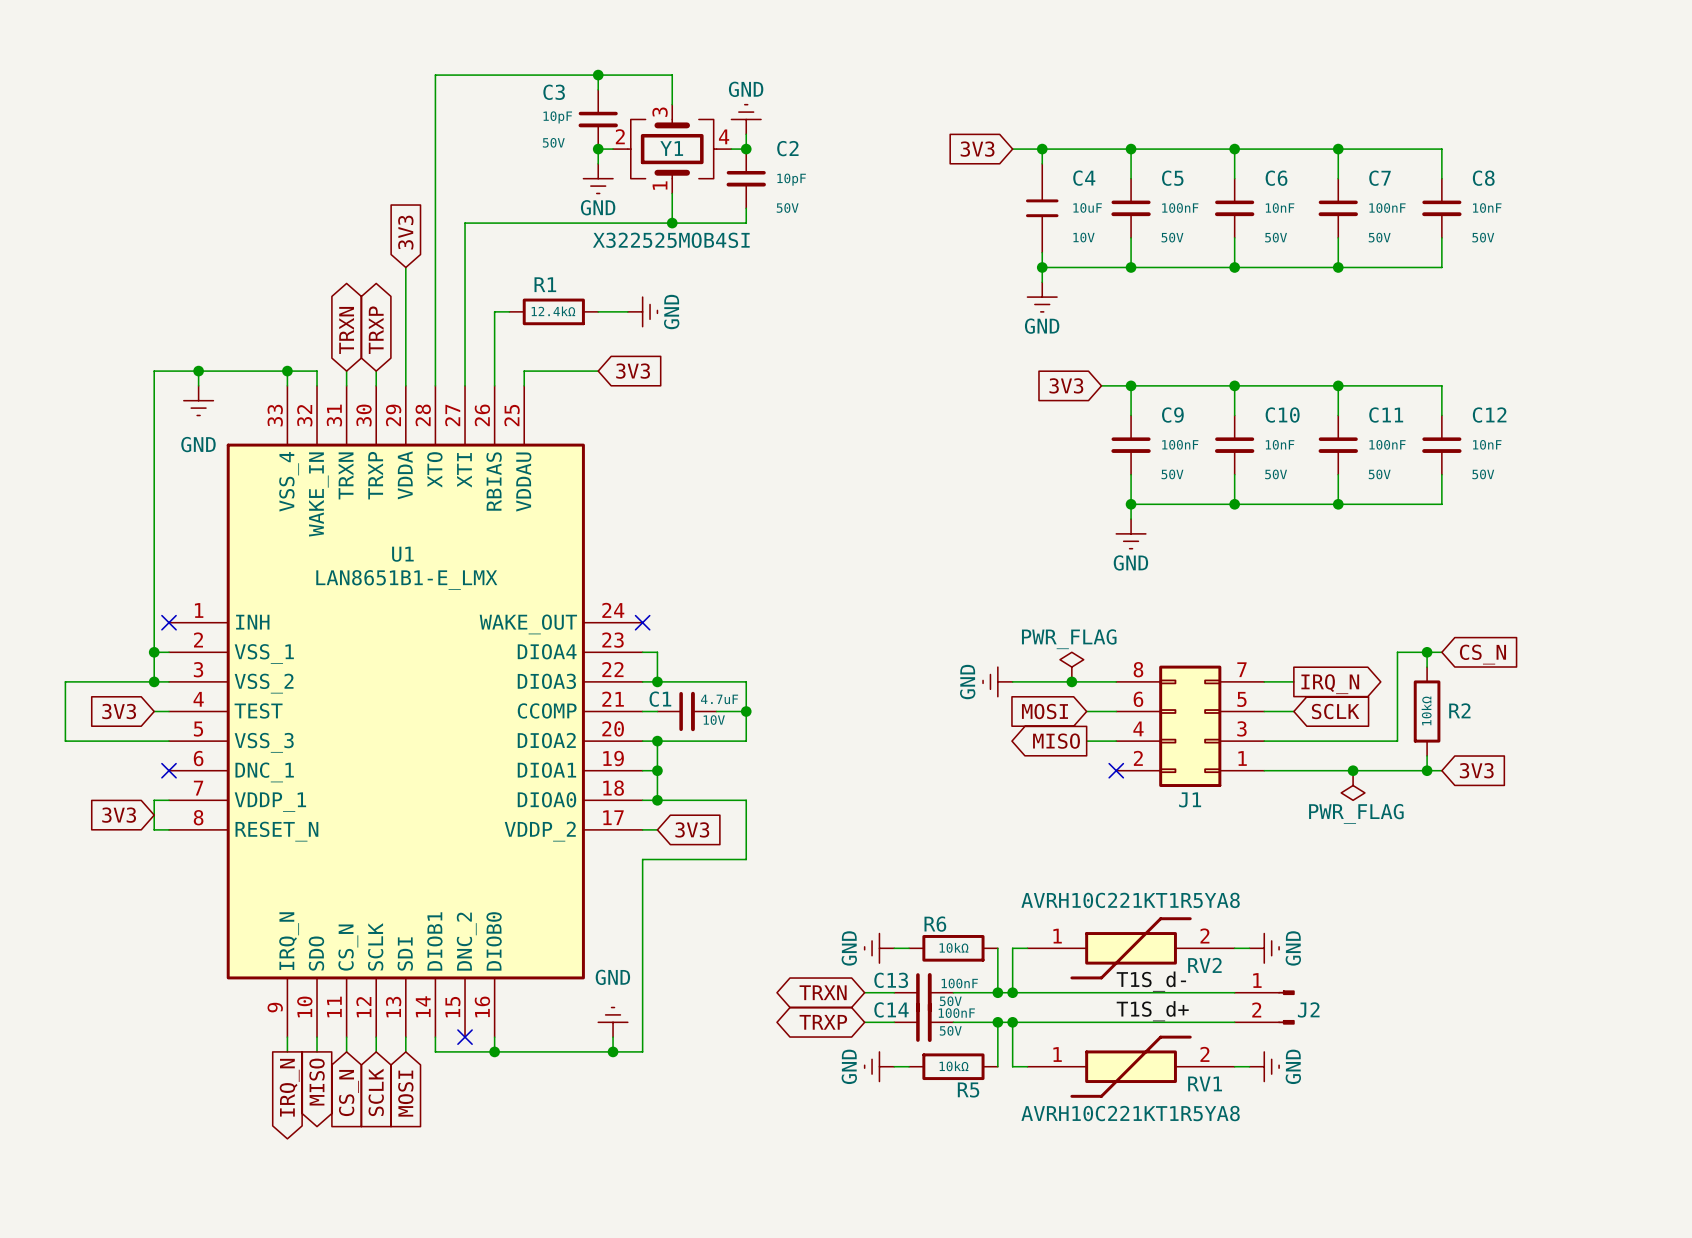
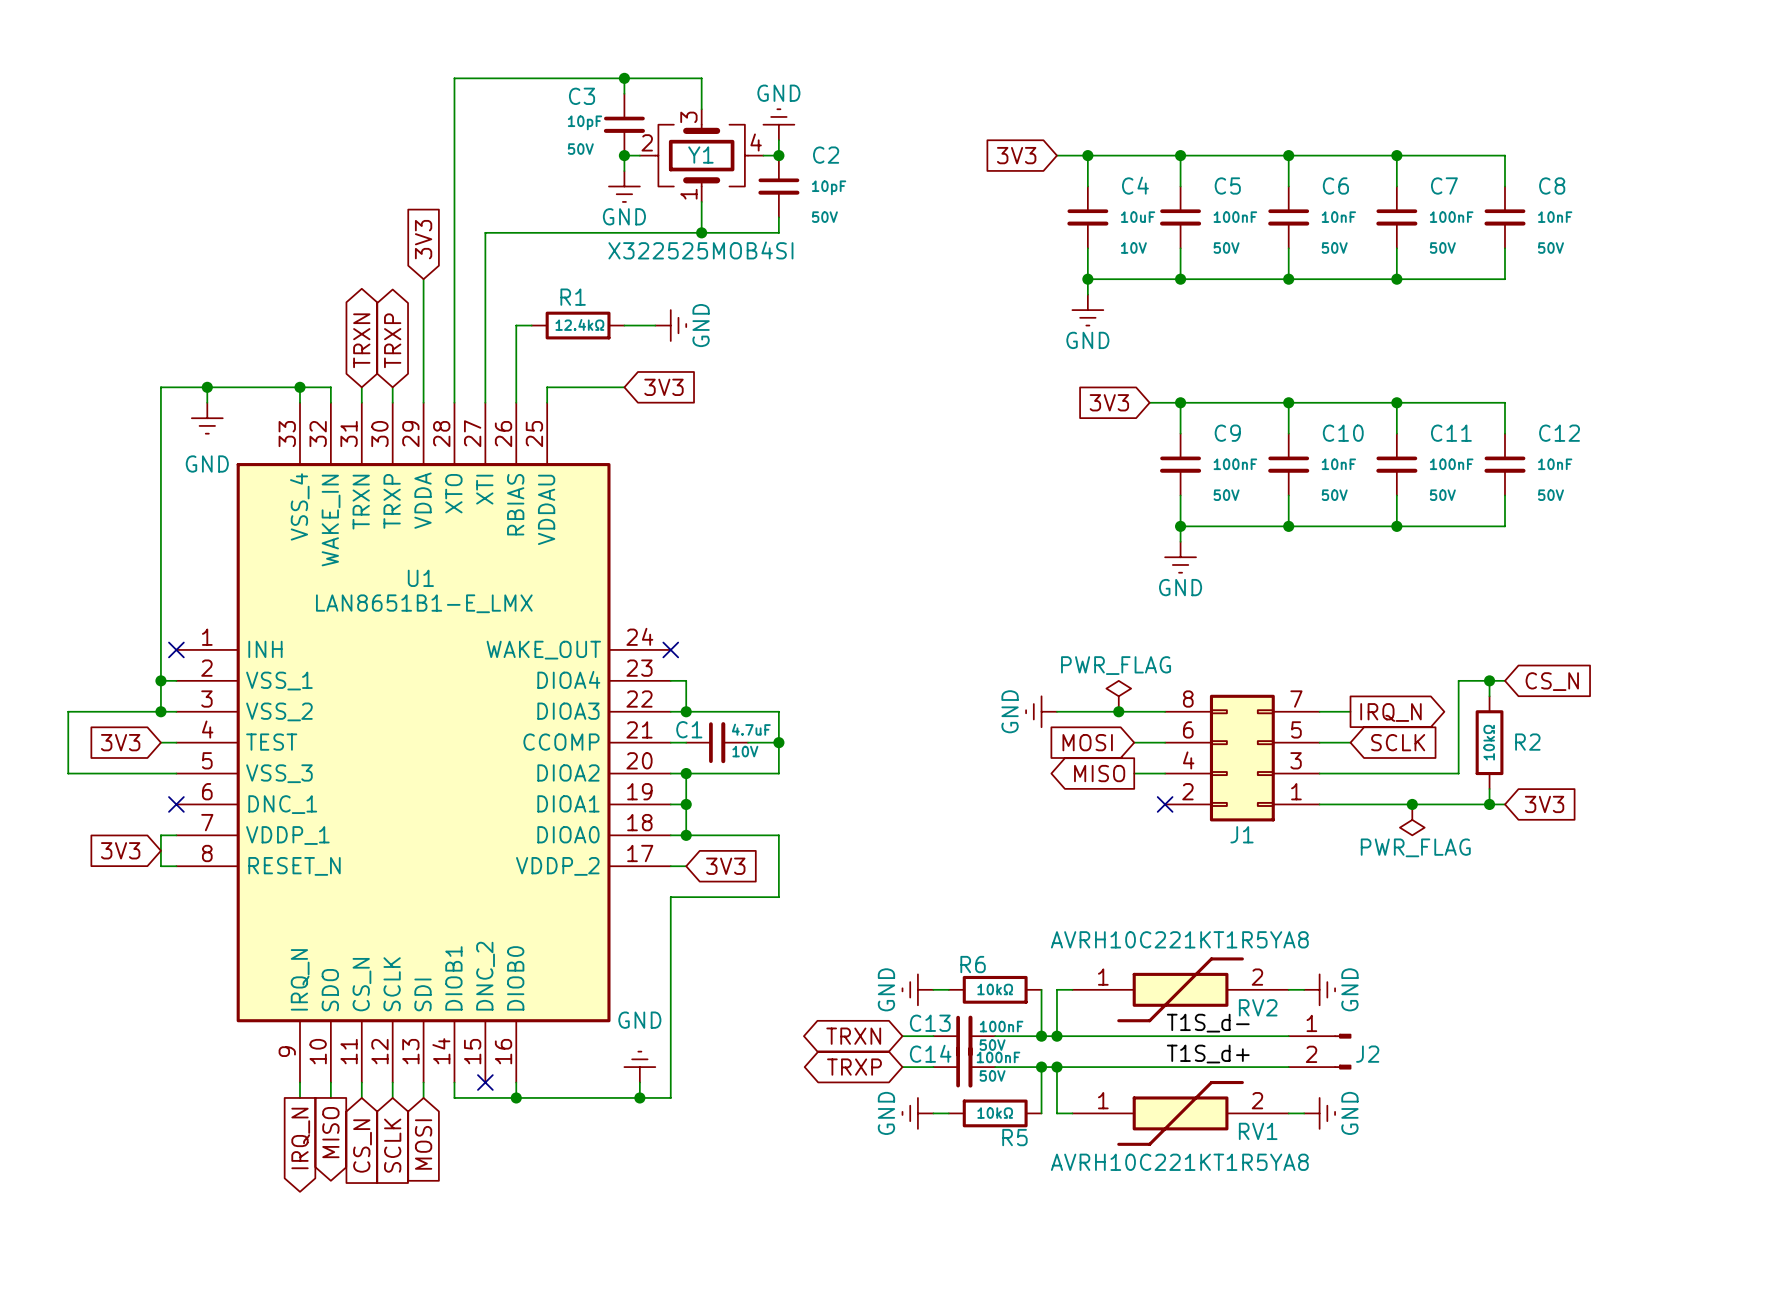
C4 symbol: [1025, 163, 1059, 253] -> [1067, 186, 1109, 249]

